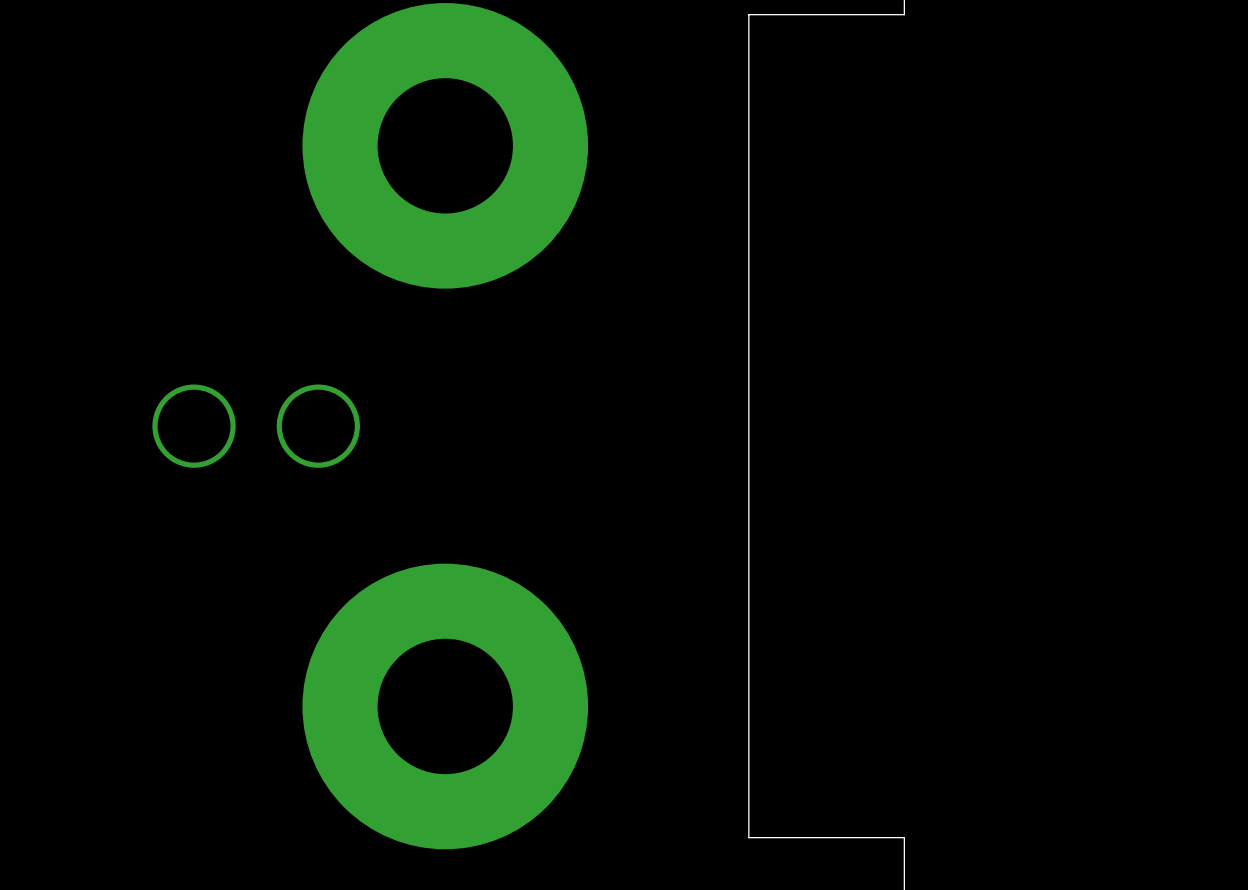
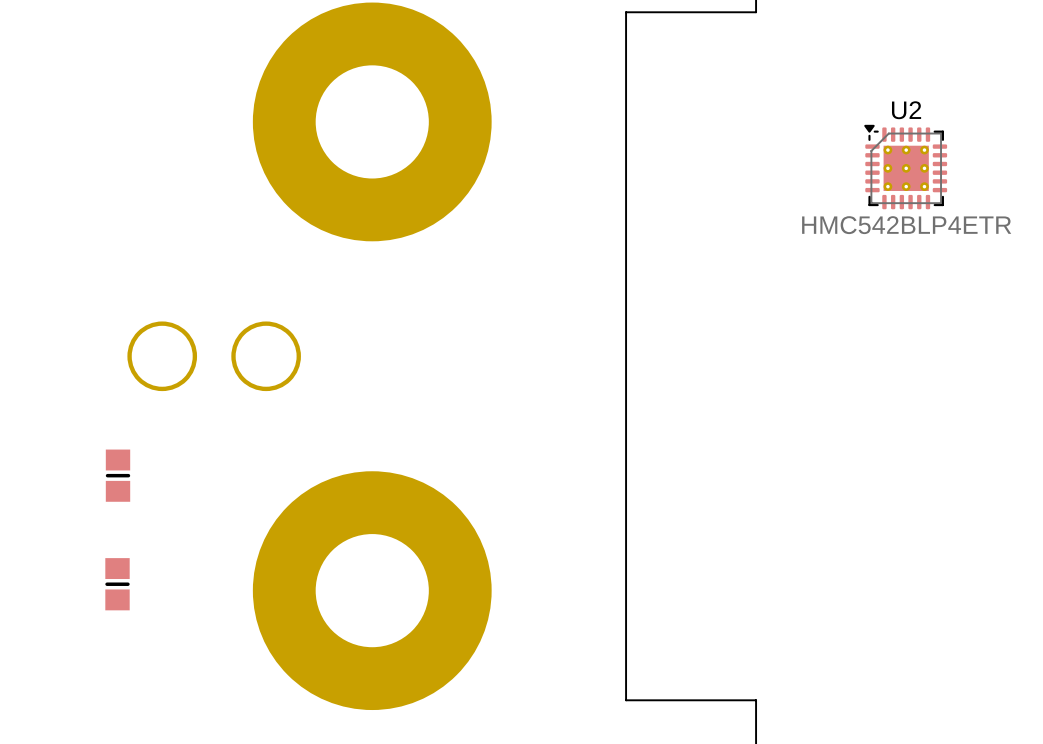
U2: none -> HMC542BLP4ETR (905, 167)
part: none -> (118, 475)
part: none -> (117, 584)

